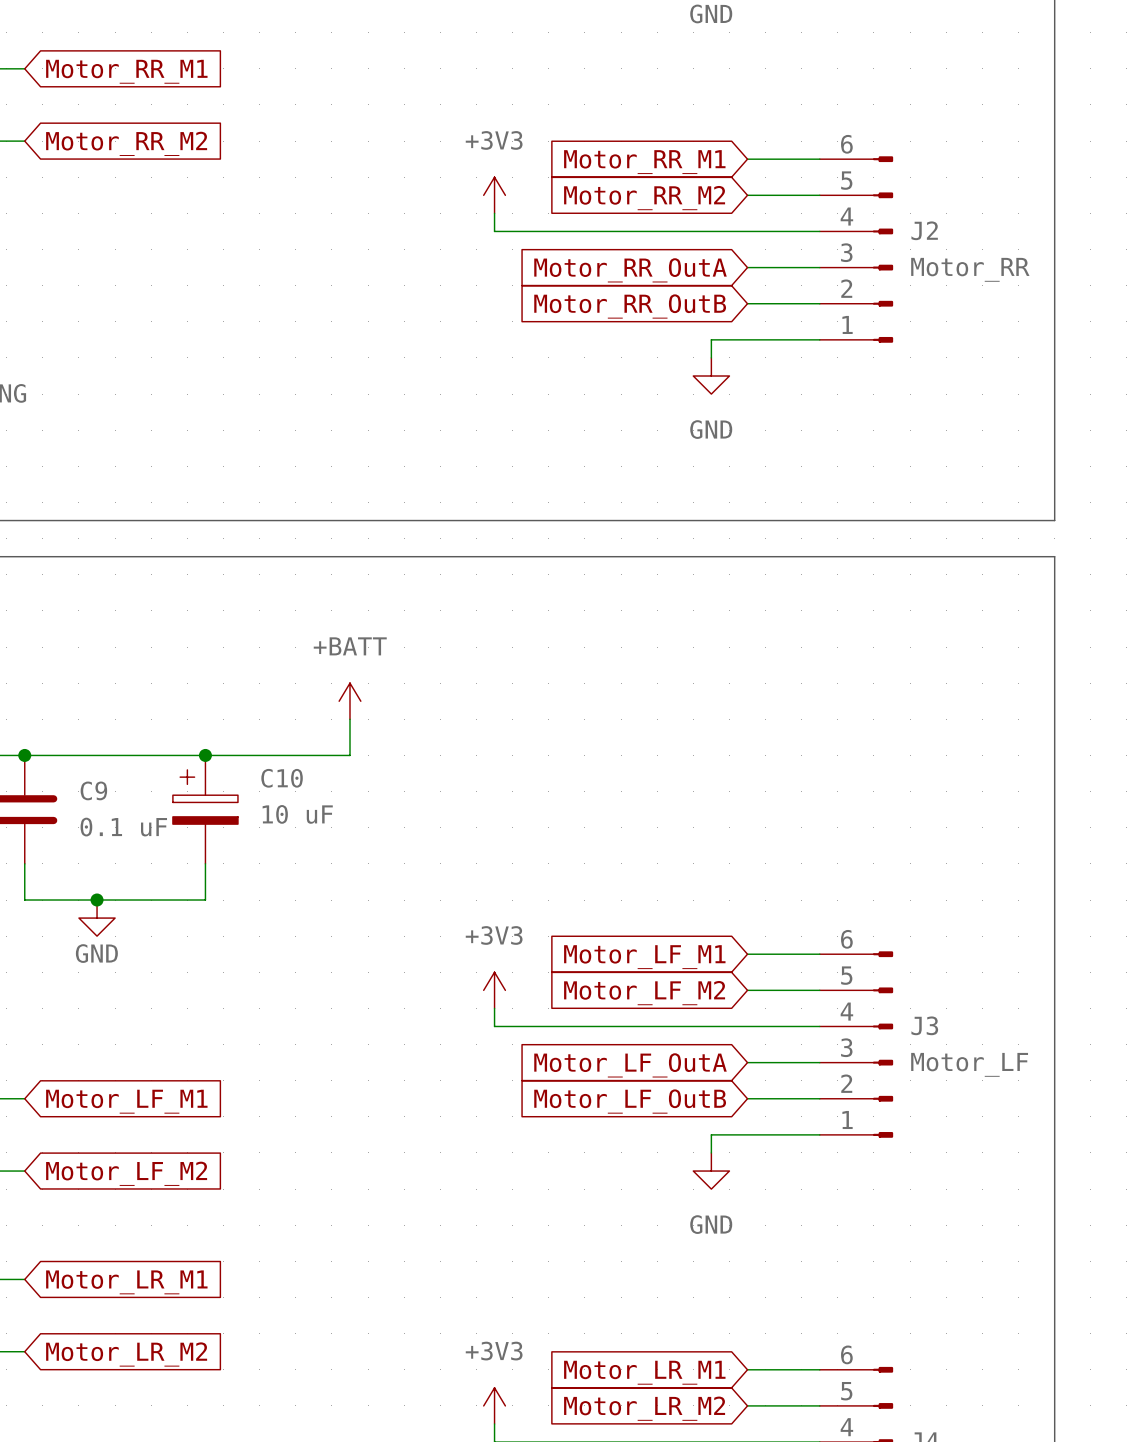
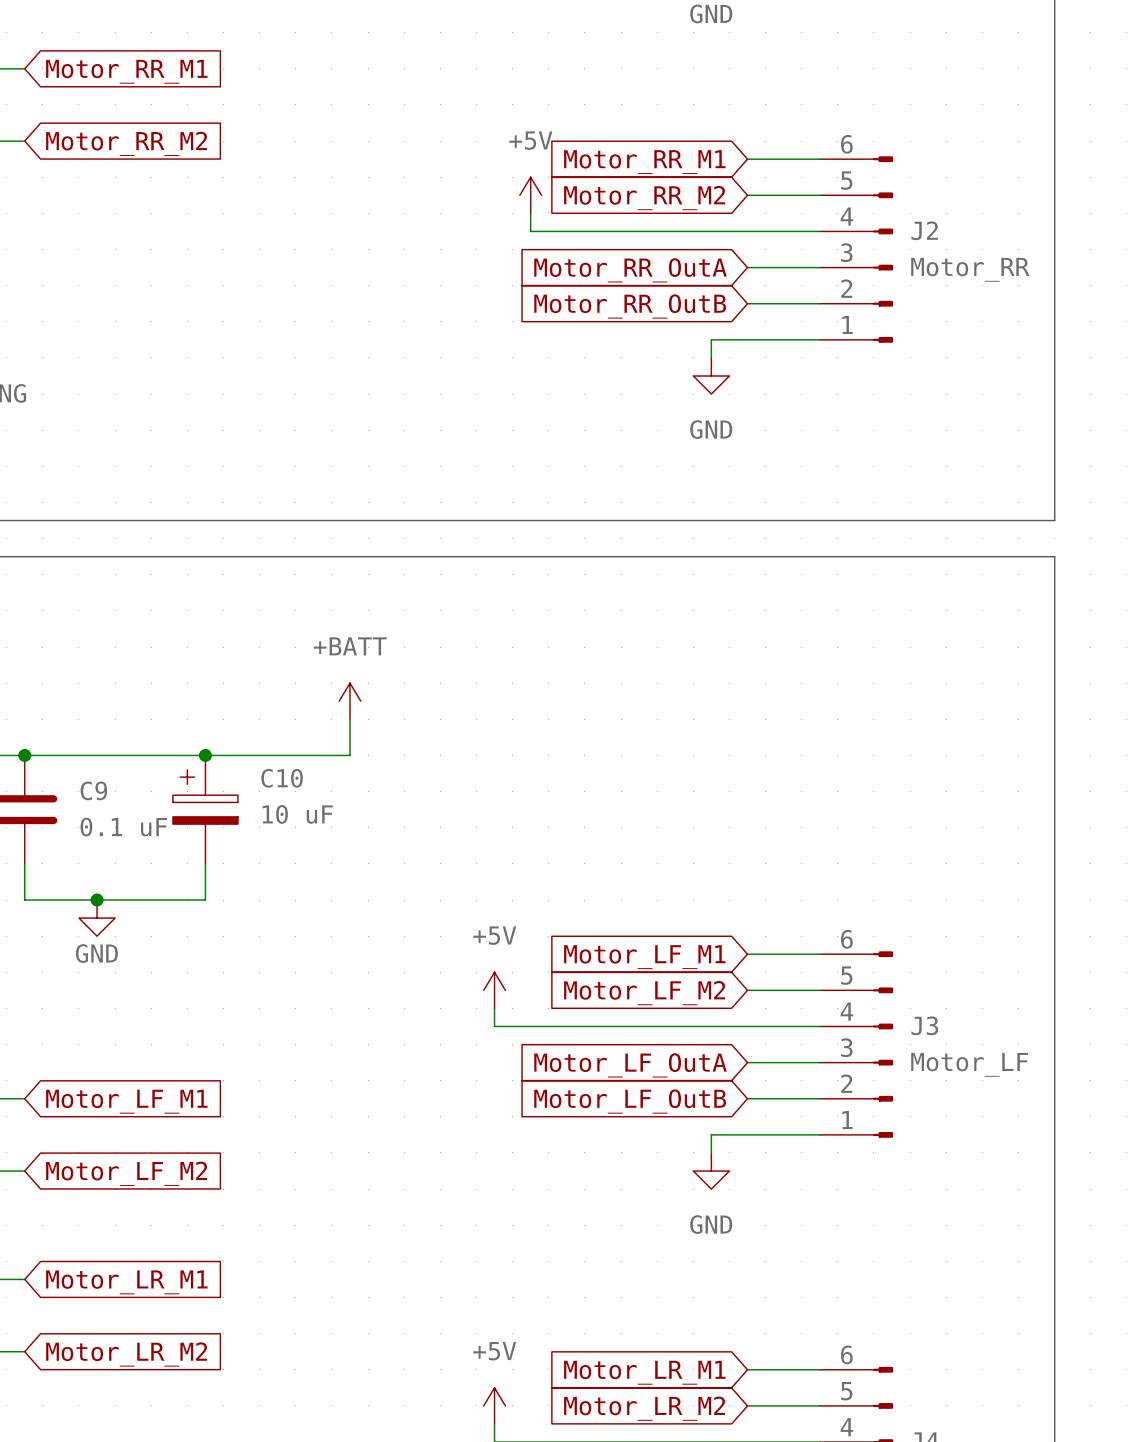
power symbol: +3V3 (494, 195) -> none
power symbol: none -> +5V (530, 195)
wire: (494, 213) (494, 231) (530, 231) -> (530, 213) (530, 231)
power symbol: +3V3 (494, 990) -> +5V (494, 990)
power symbol: +3V3 (494, 1405) -> +5V (494, 1405)

